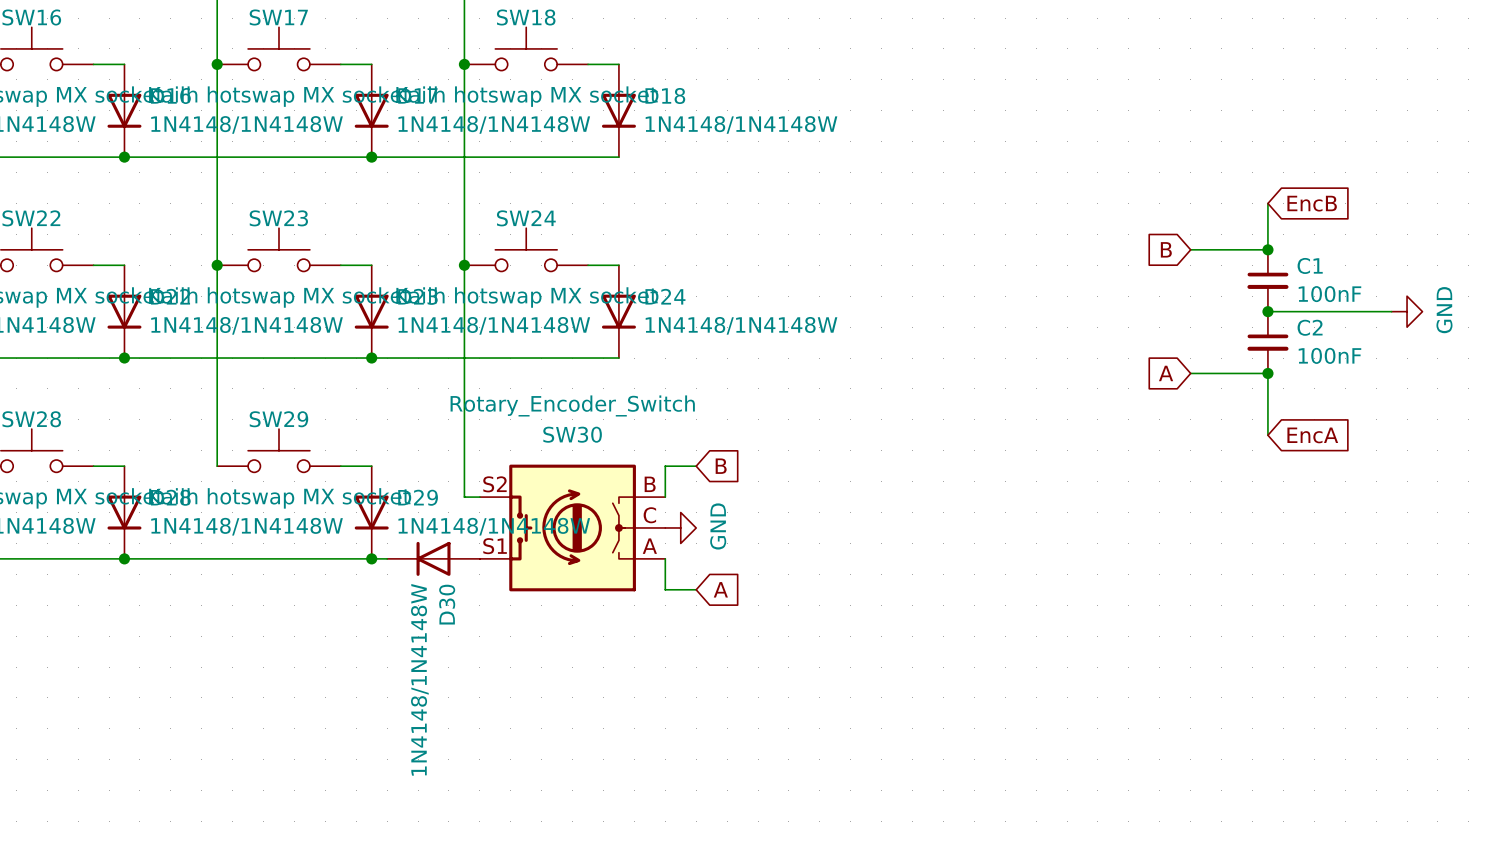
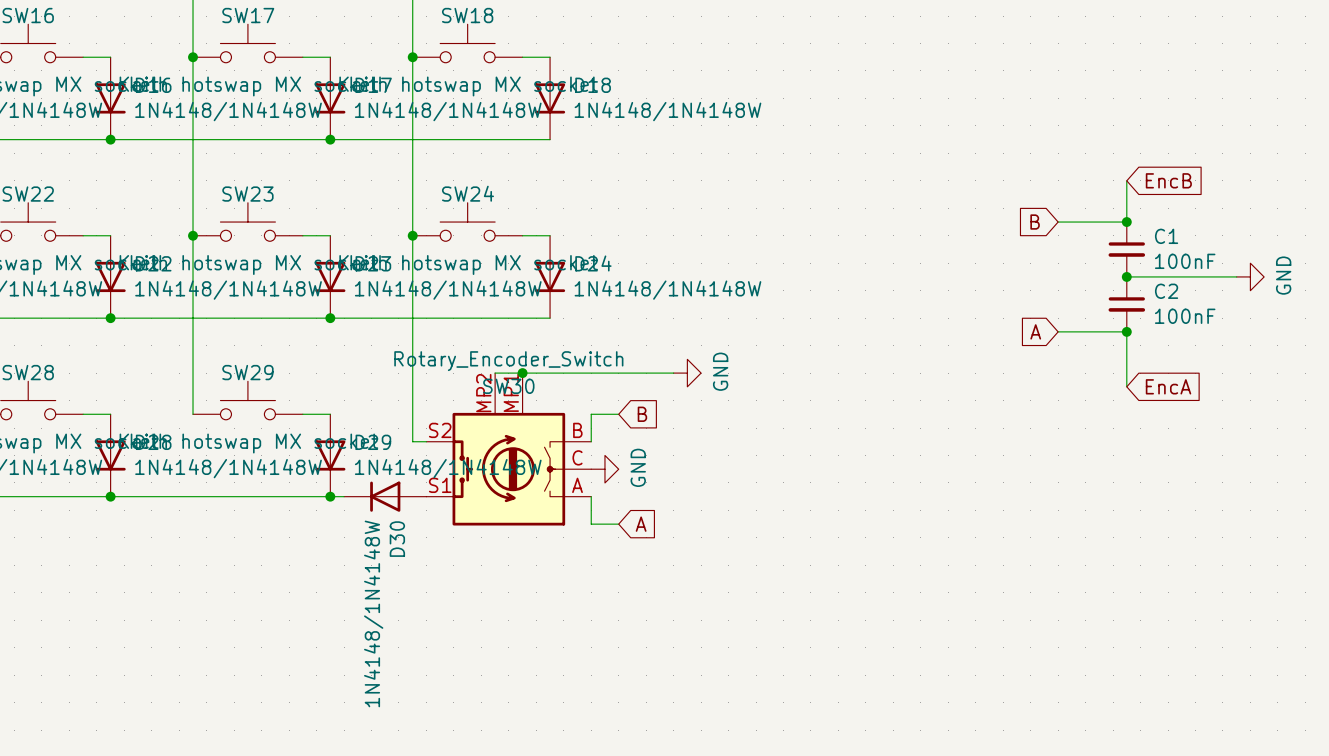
wire: none -> (495, 373) (673, 373)
junction: none -> (522, 373)
power symbol: none -> GND (687, 373)
SW30 symbol: [479, 464, 666, 592] -> [426, 373, 592, 526]

